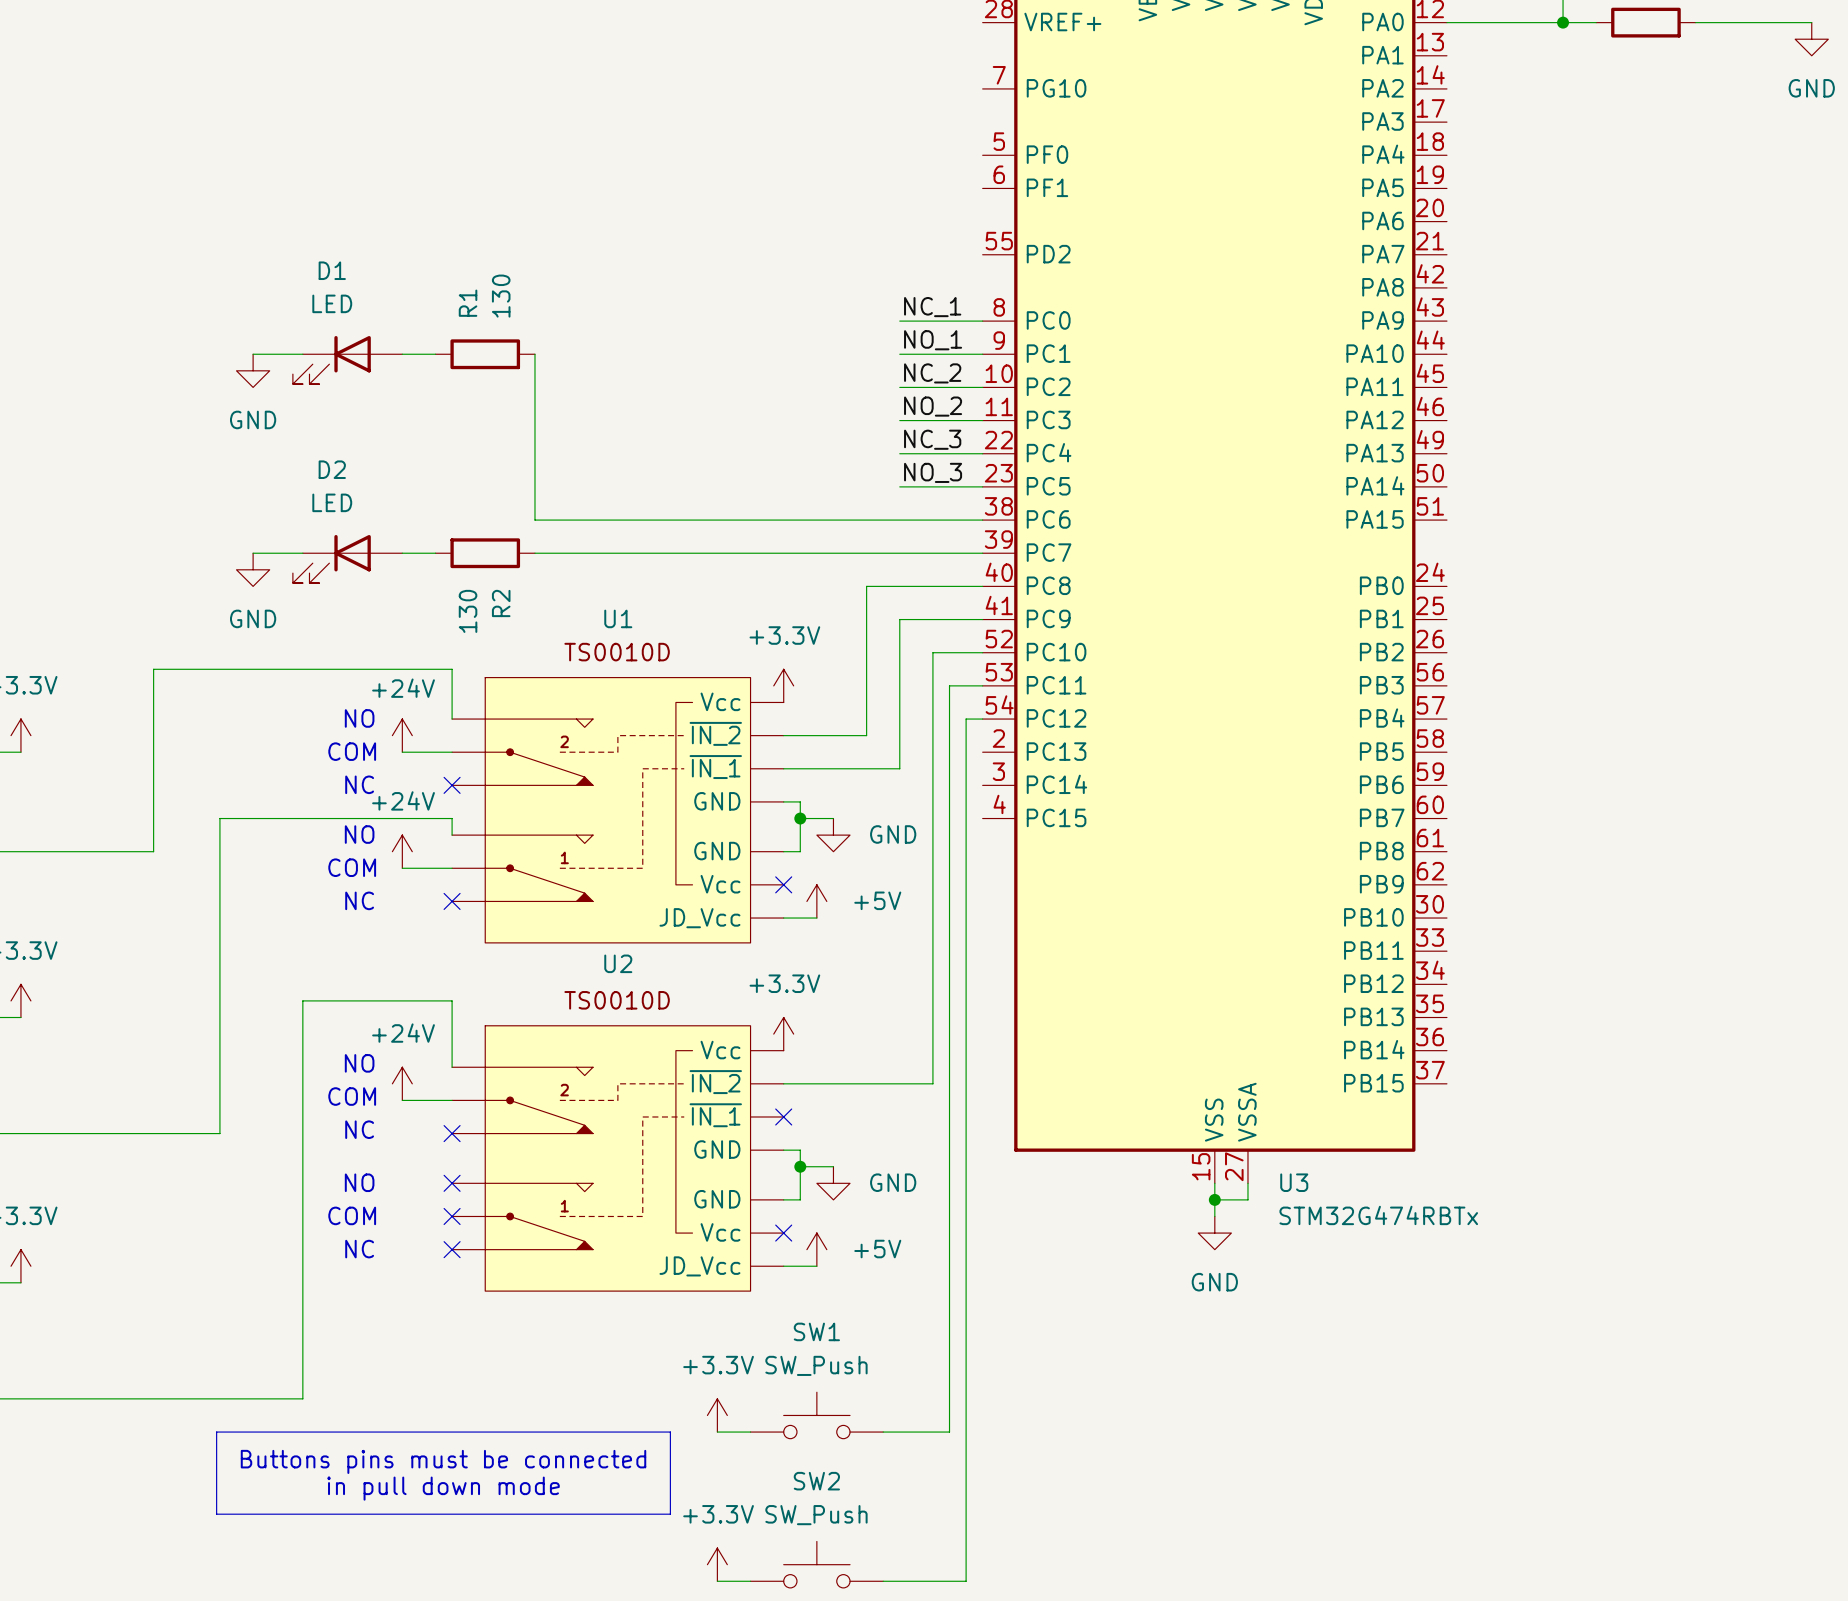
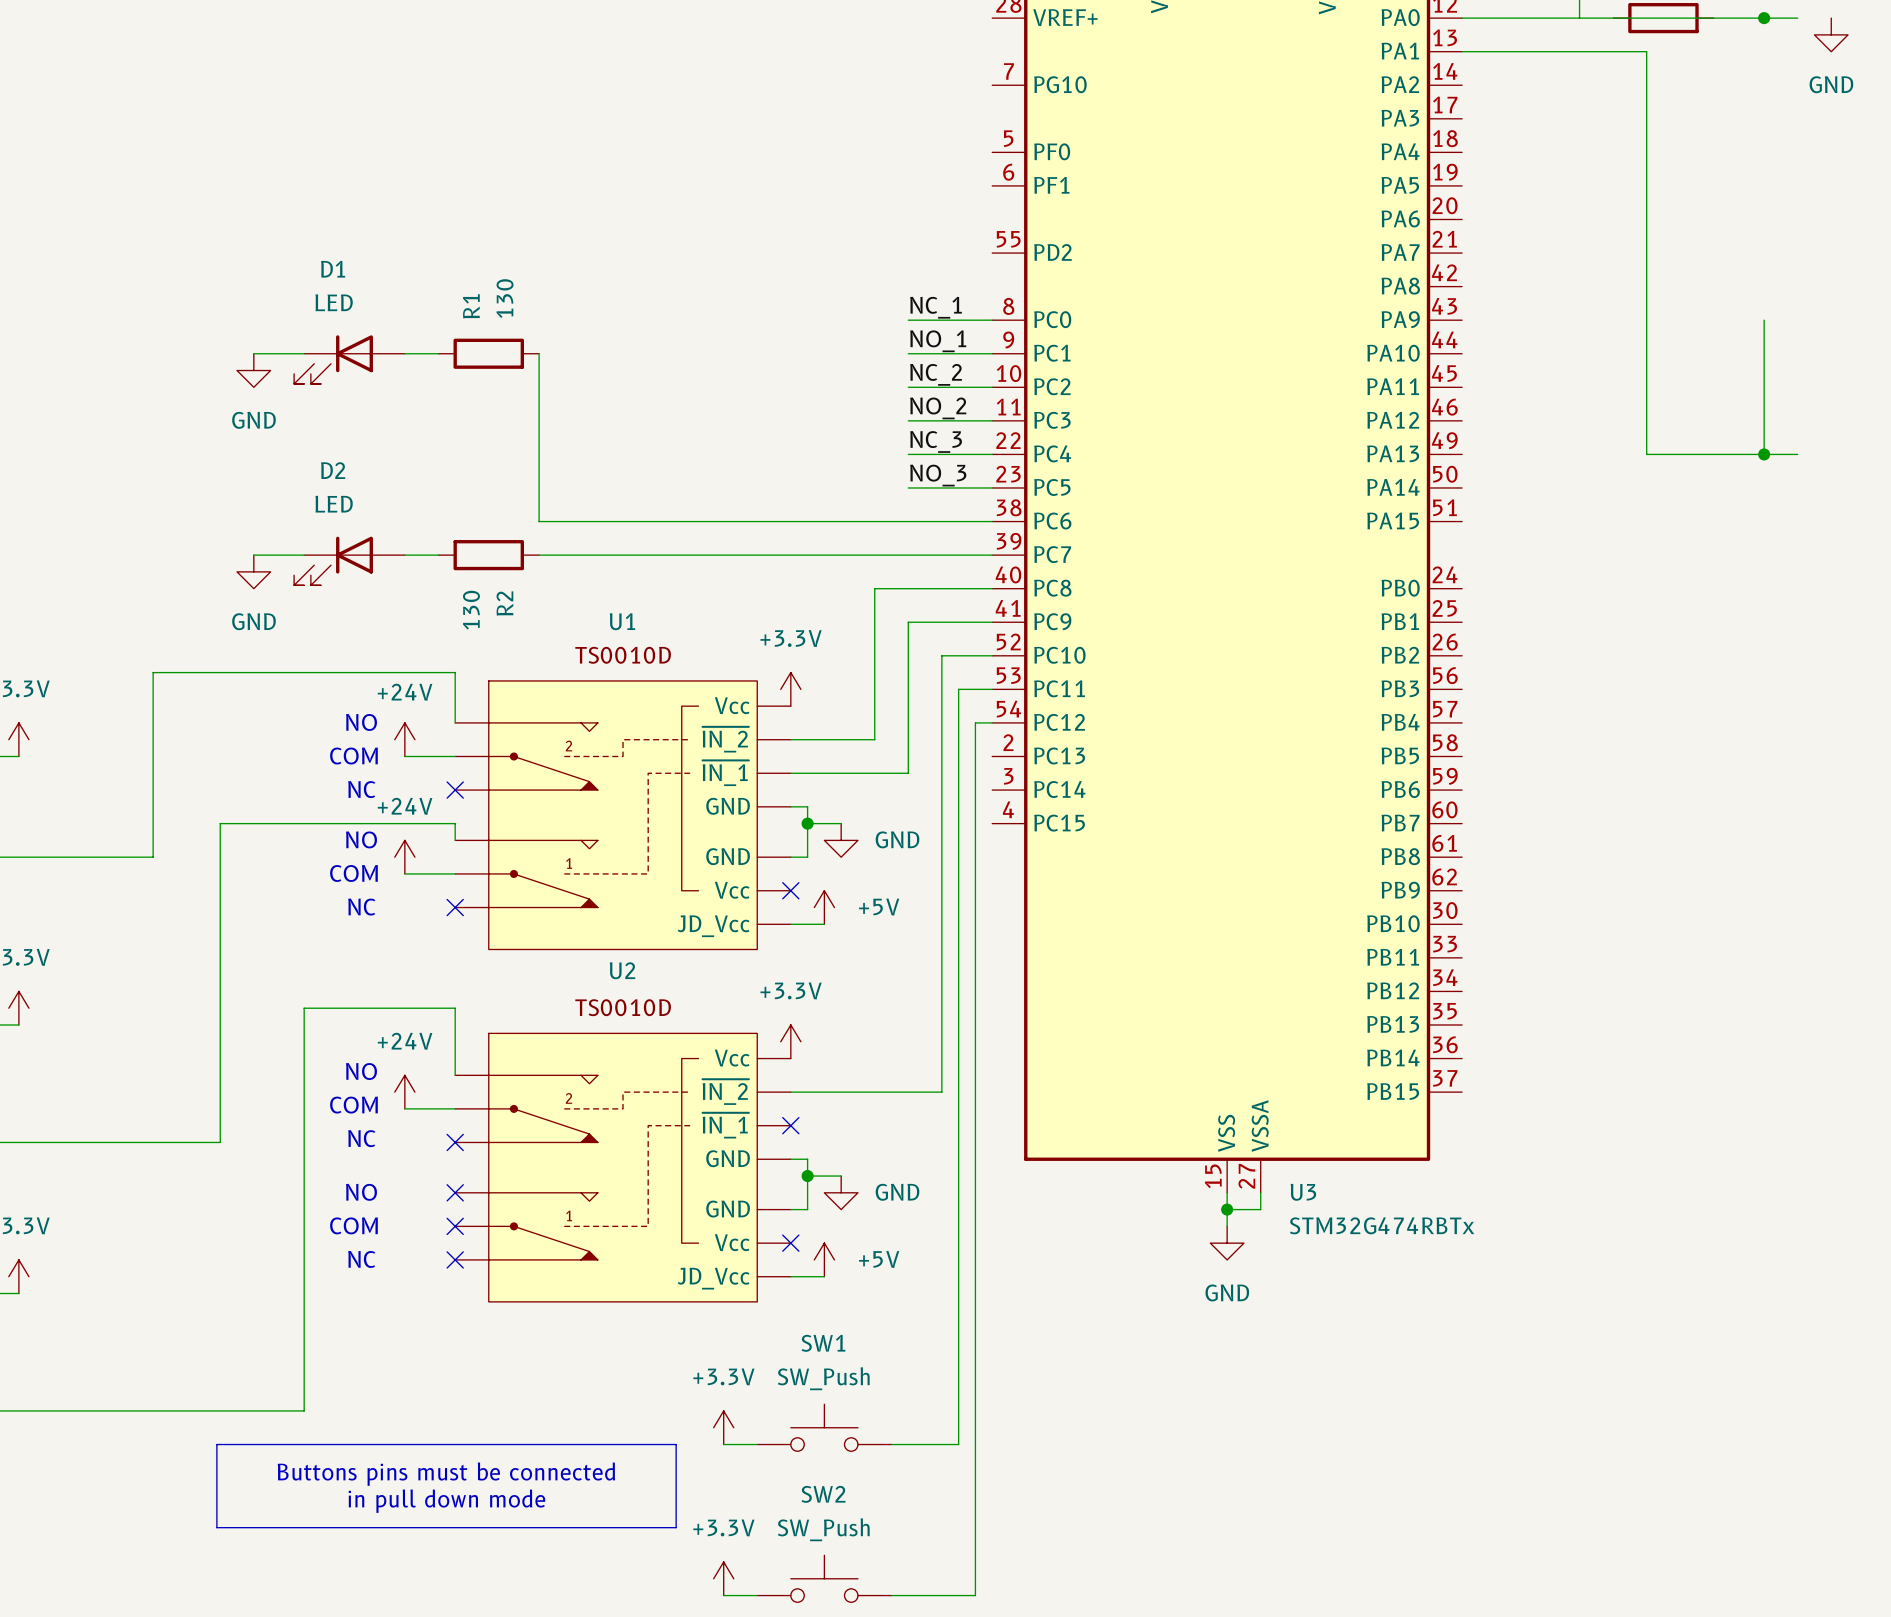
junction: (1563, 22) -> none
wire: none -> (1613, 18) (1713, 18)
junction: none -> (1764, 18)
wire: (1778, 22) (1811, 22) -> none
wire: none -> (1462, 51) (1646, 51) (1646, 454) (1797, 454)
wire: none -> (1764, 320) (1764, 454)
junction: none -> (1764, 454)

